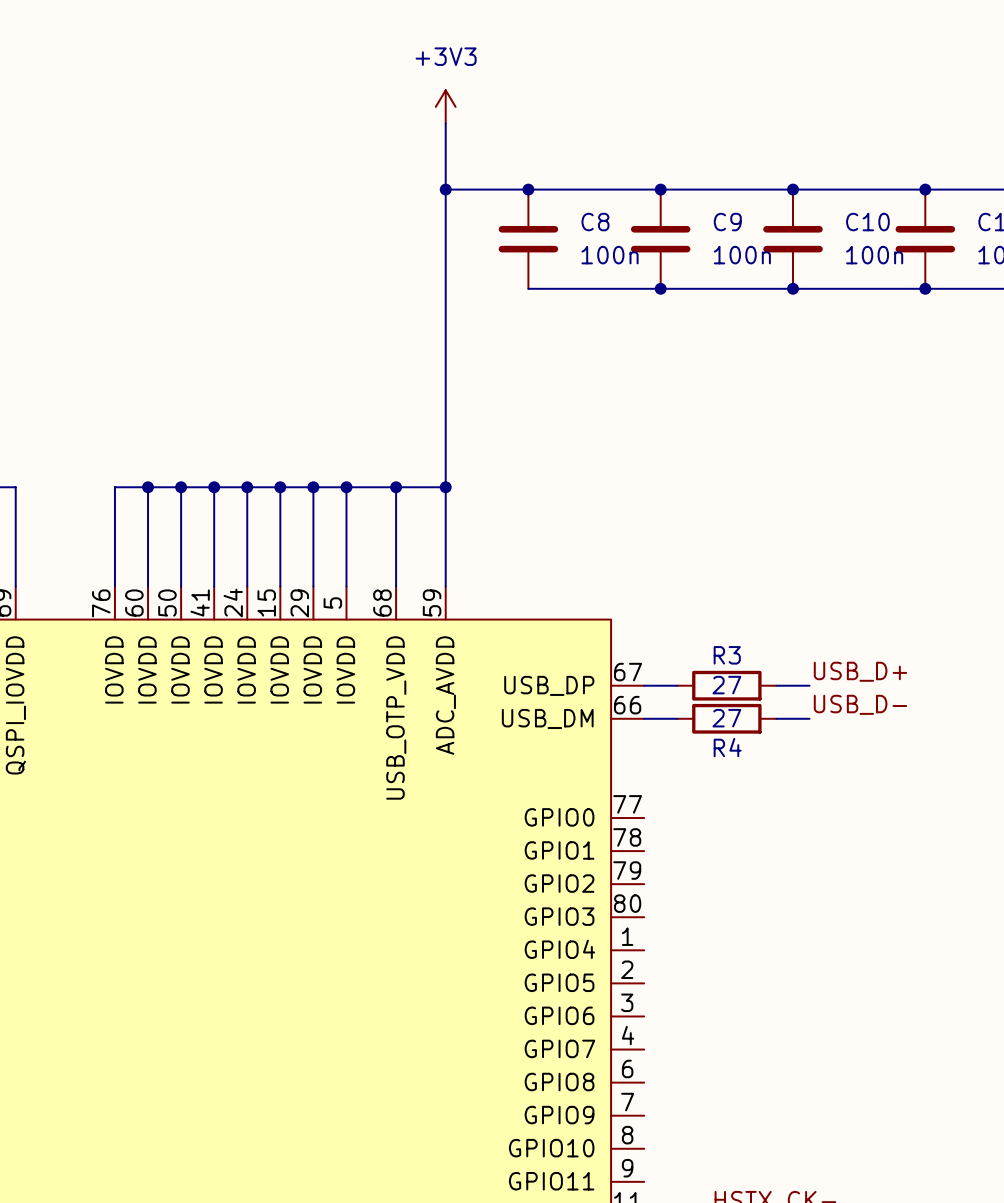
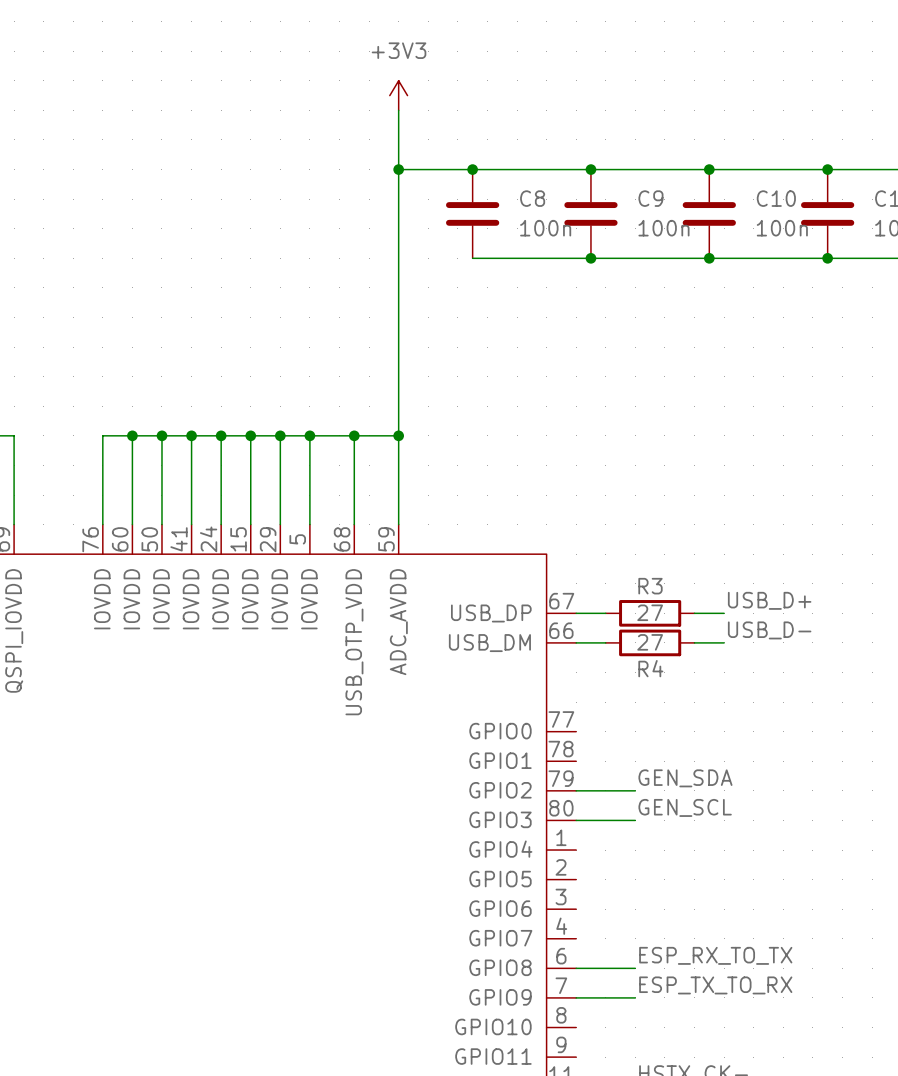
label: none -> GEN_SDA (685, 778)
wire: none -> (576, 790) (635, 790)
label: none -> GEN_SCL (685, 807)
wire: none -> (576, 820) (635, 820)
label: none -> ESP_RX_TO_TX (715, 955)
wire: none -> (576, 968) (635, 968)
label: none -> ESP_TX_TO_RX (715, 985)
wire: none -> (576, 997) (635, 997)

